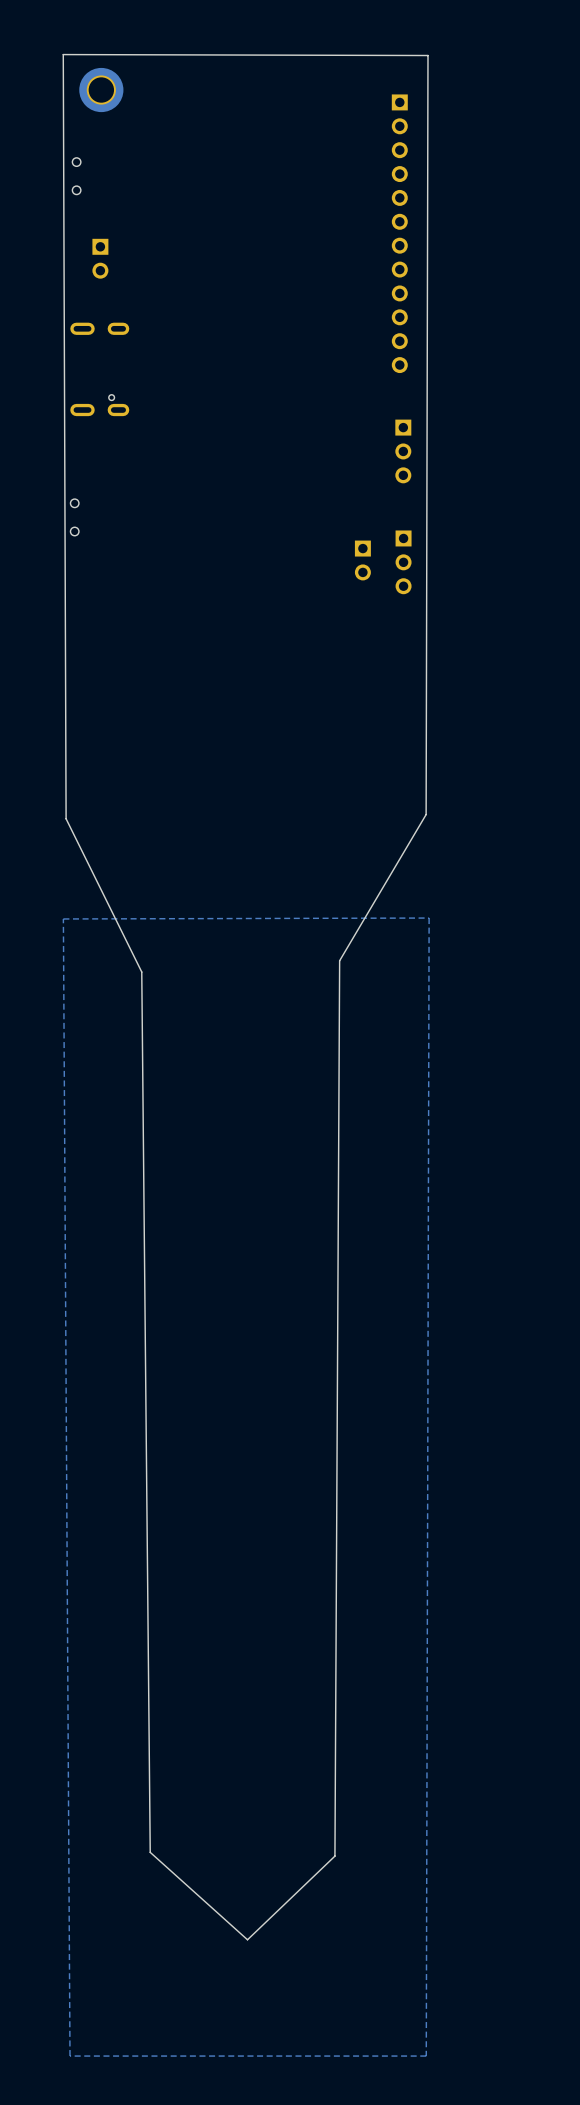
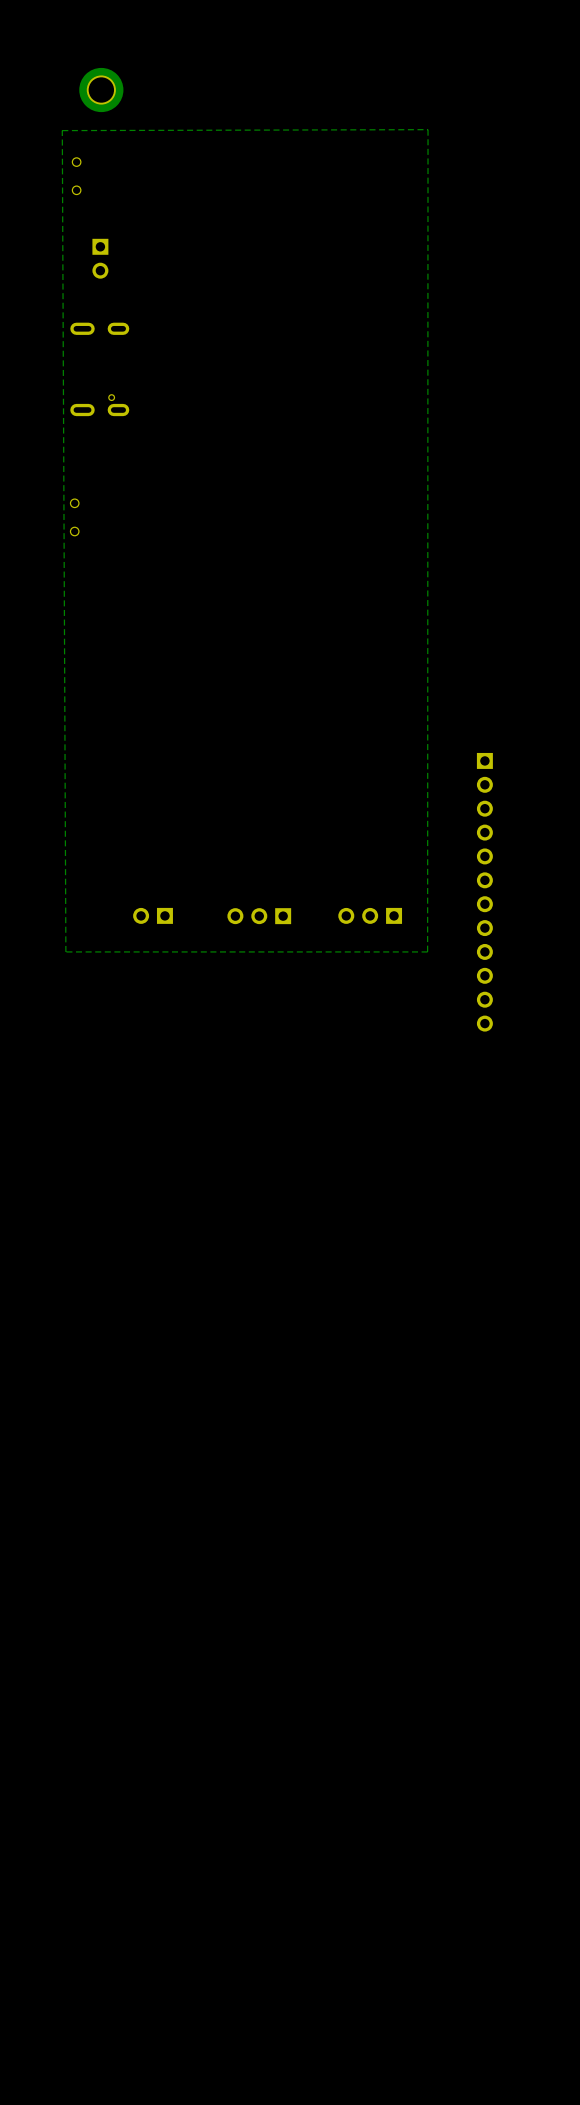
board edge: (63, 54) (66, 818) (141, 972) (150, 1852) (247, 1939) (334, 1856) (339, 960) (426, 814) (428, 55) (63, 54) -> none
zone outline: none -> (428, 129) (62, 130) (65, 951) (427, 951) (428, 129)
part: (399, 233) -> none
part: (403, 451) -> none
part: (362, 560) -> none
part: (403, 562) -> none
part: none -> (484, 892)
part: none -> (153, 915)
part: none -> (370, 915)
part: none -> (259, 916)
zone outline: (429, 918) (63, 918) (70, 2056) (426, 2056) (429, 918) -> none

